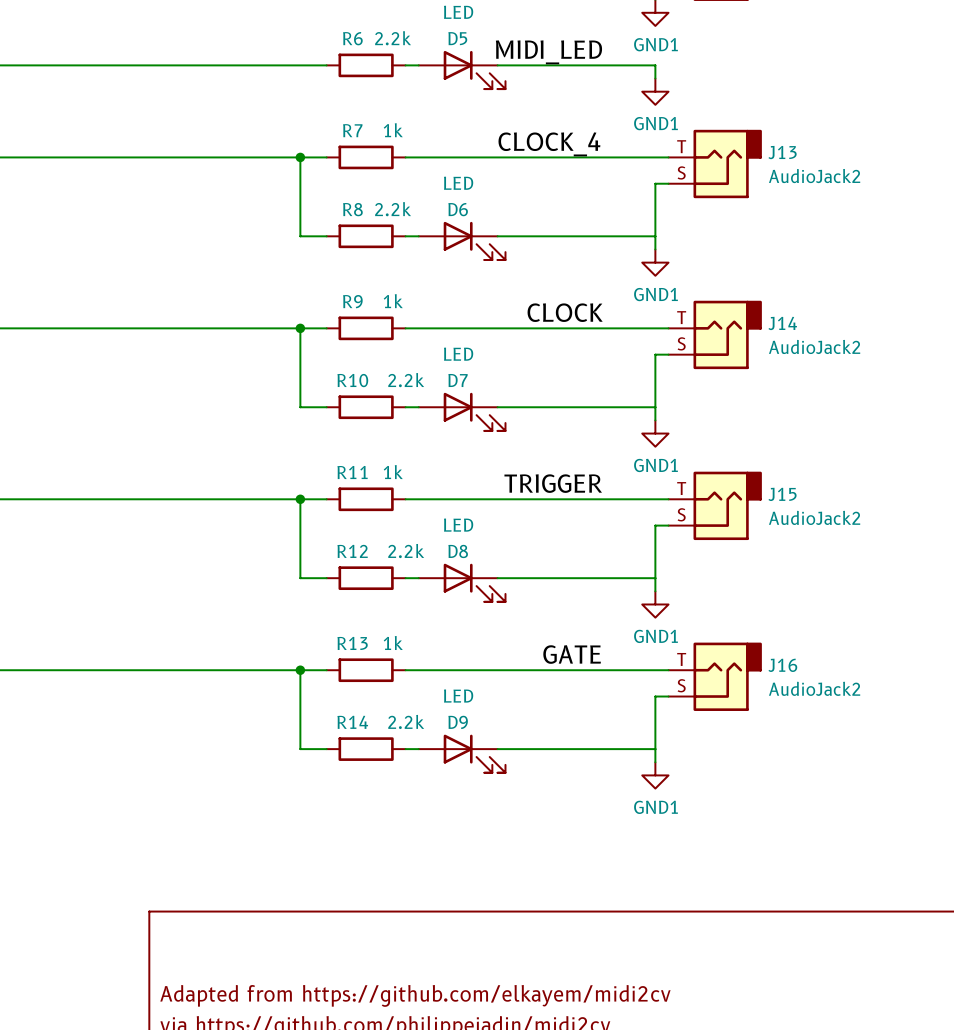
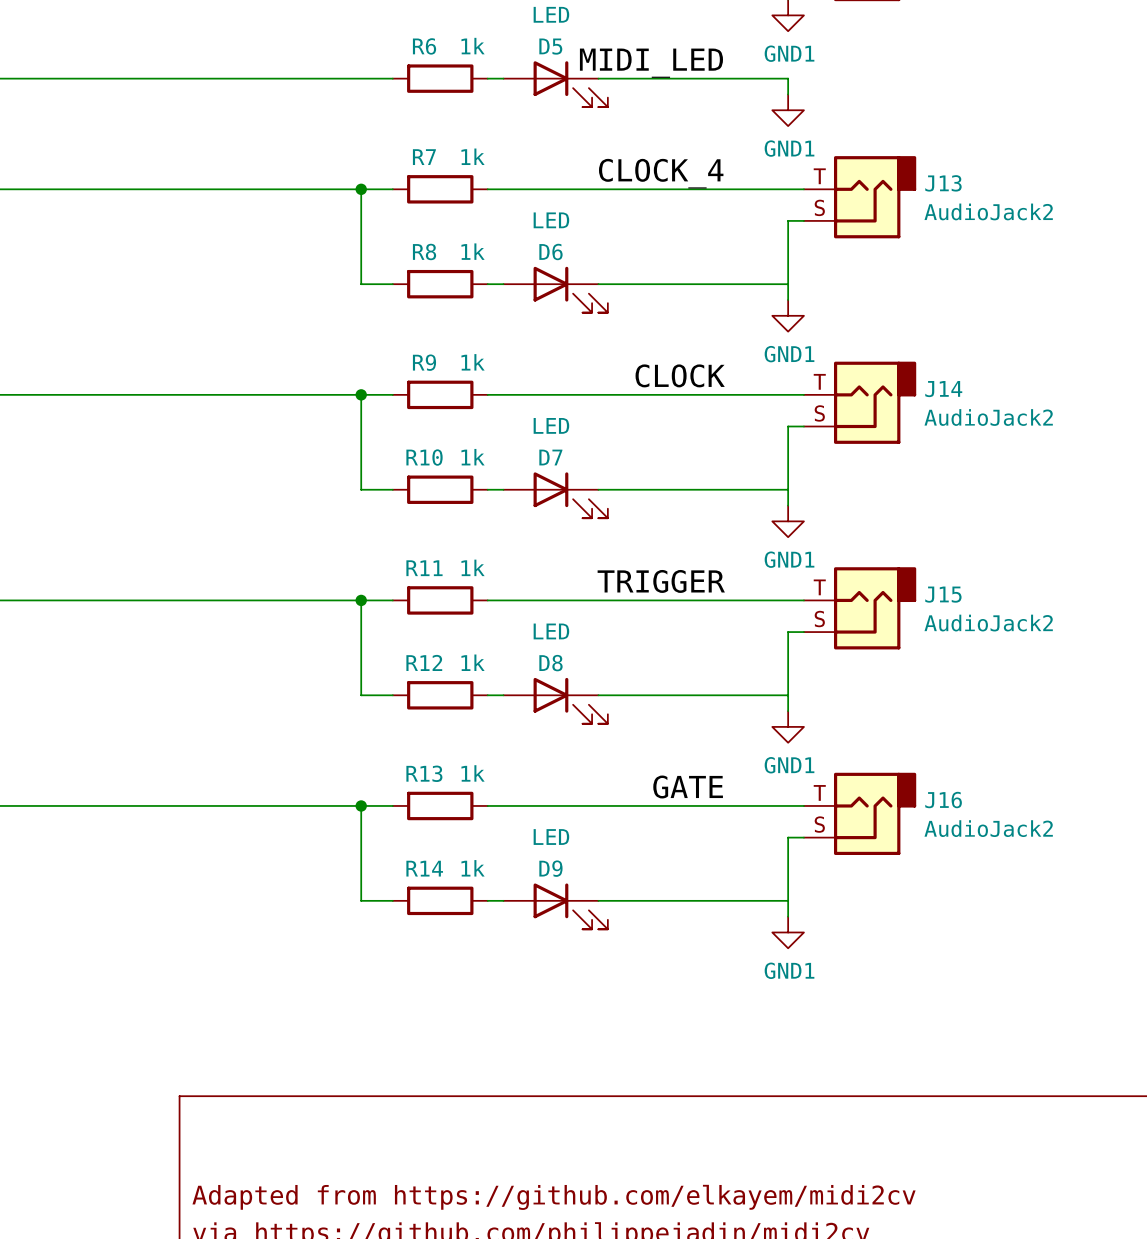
R6 value: 2.2k (393, 38) -> 1k (473, 46)
R8 value: 2.2k (393, 209) -> 1k (473, 251)
R10 value: 2.2k (406, 380) -> 1k (473, 457)
R12 value: 2.2k (406, 551) -> 1k (473, 662)
R14 value: 2.2k (406, 721) -> 1k (473, 868)

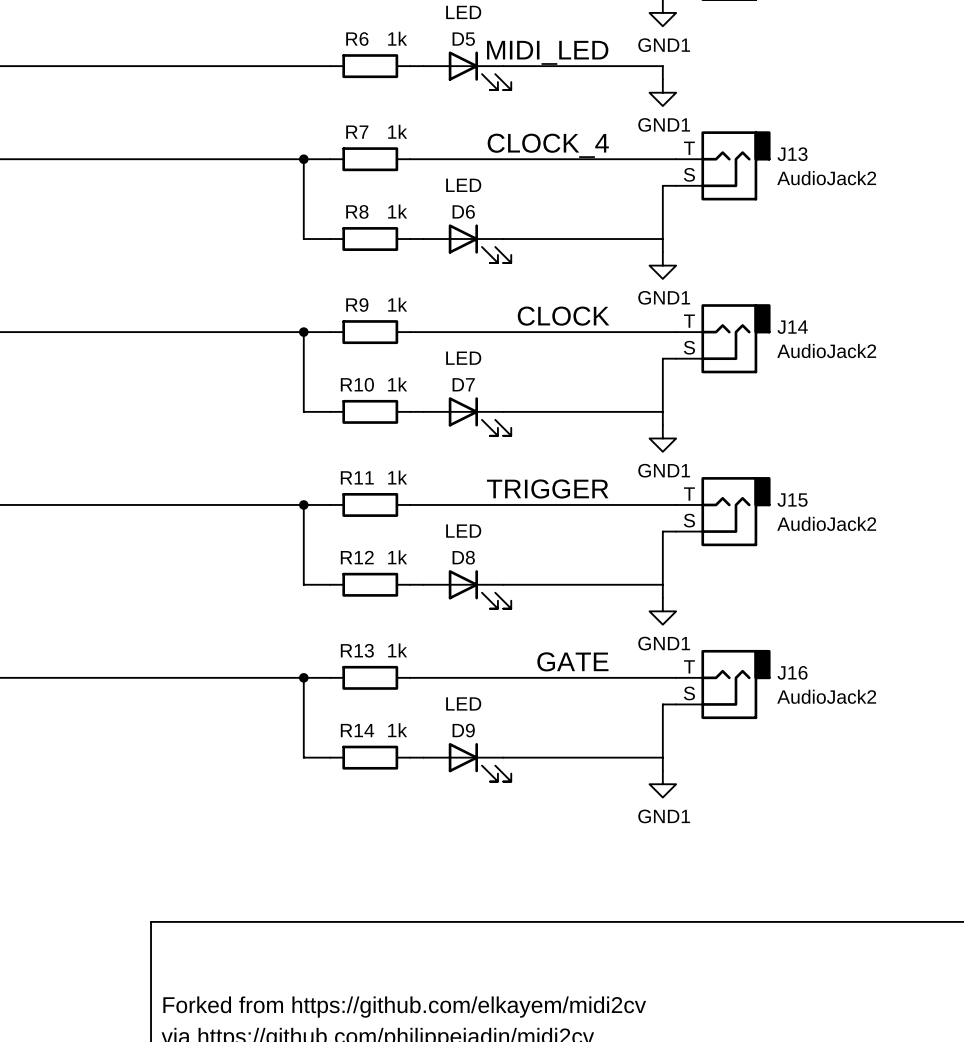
title block: Adapted from https://github.com/elkayem/midi2cv (554, 1197) -> Forked from https://github.com/elkayem/midi2cv (404, 1007)

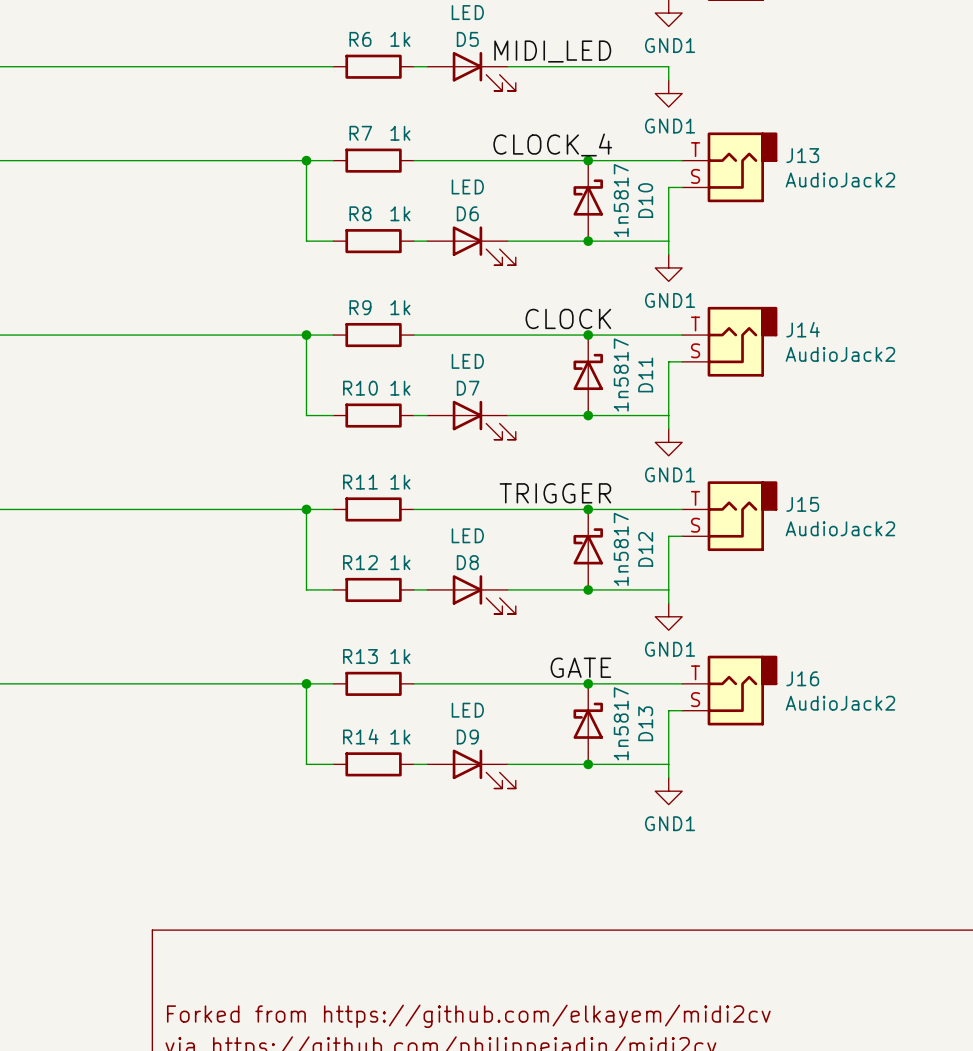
junction: none -> (588, 160)
D10: none -> 1n5817 (588, 200)
junction: none -> (588, 241)
junction: none -> (588, 335)
D11: none -> 1n5817 (588, 375)
junction: none -> (588, 415)
junction: none -> (588, 509)
D12: none -> 1n5817 (588, 549)
junction: none -> (588, 589)
junction: none -> (588, 683)
D13: none -> 1n5817 (588, 724)
junction: none -> (588, 764)

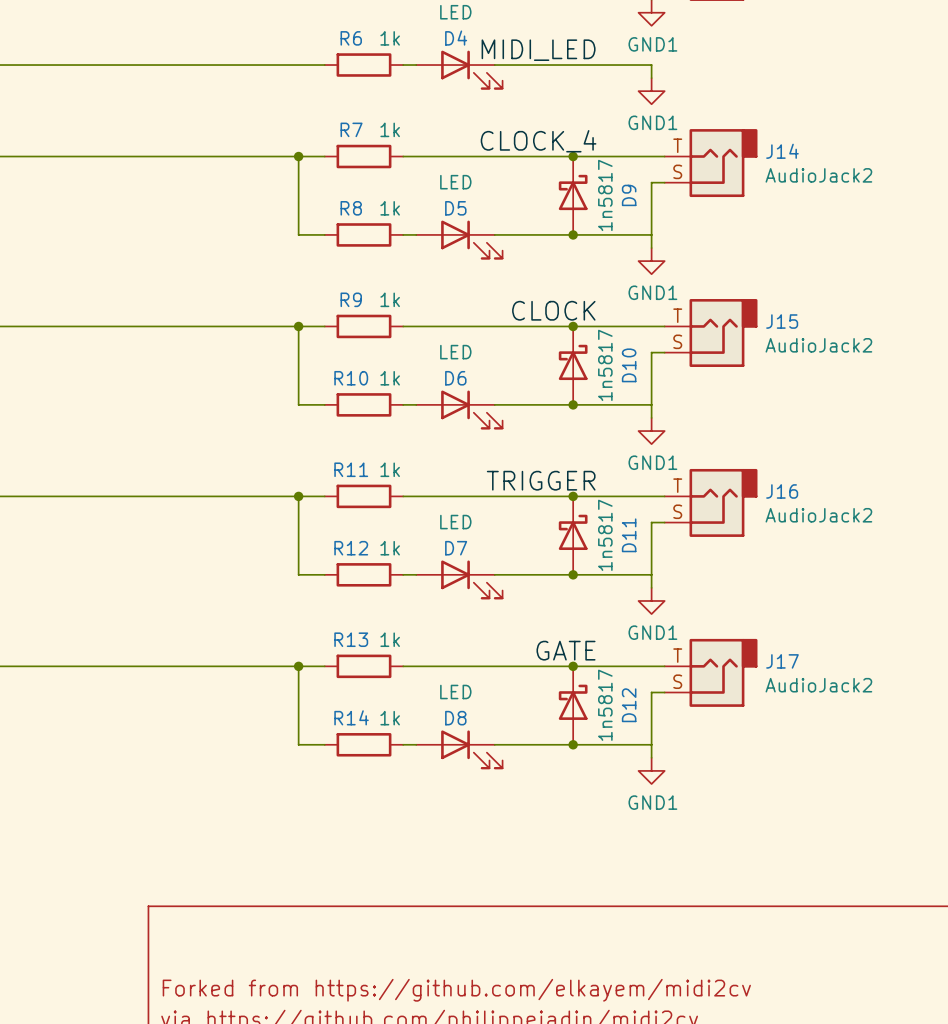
D5 name: D5 (467, 39) -> D4 (456, 38)
J13 name: J13 (802, 155) -> J14 (782, 151)
D10 name: D10 (645, 200) -> D9 (629, 195)
D6 name: D6 (467, 213) -> D5 (455, 208)
J14 name: J14 (803, 329) -> J15 (782, 321)
D11 name: D11 (645, 374) -> D10 (629, 365)
D7 name: D7 (468, 388) -> D6 (455, 378)
J15 name: J15 (802, 504) -> J16 (782, 491)
D12 name: D12 (645, 549) -> D11 (629, 535)
D8 name: D8 (467, 562) -> D7 (456, 548)
J16 name: J16 (802, 678) -> J17 (782, 661)
D13 name: D13 (645, 723) -> D12 (629, 705)
D9 name: D9 (467, 737) -> D8 (455, 718)

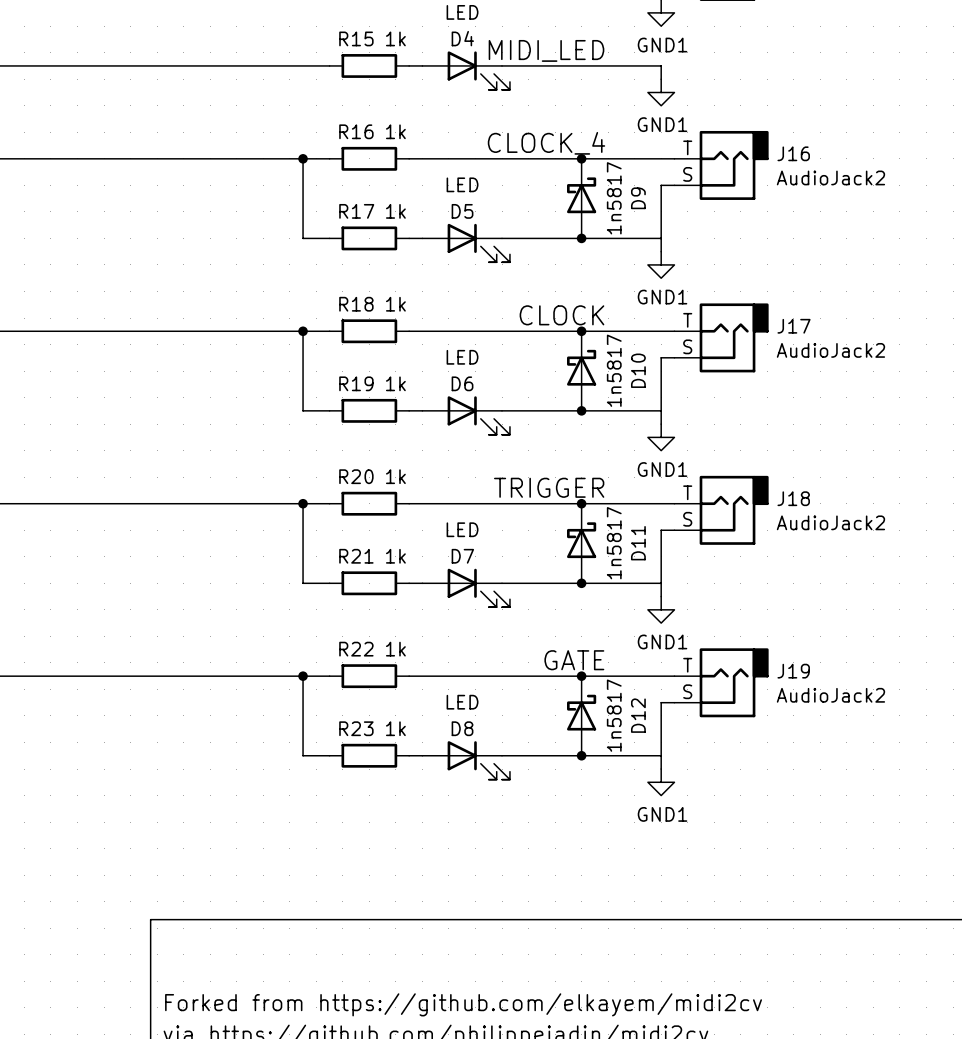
R6 name: R6 (351, 38) -> R15 (356, 38)
R7 name: R7 (351, 129) -> R16 (356, 131)
J14 name: J14 (782, 151) -> J16 (793, 153)
R8 name: R8 (351, 208) -> R17 (356, 211)
R9 name: R9 (351, 299) -> R18 (356, 304)
J15 name: J15 (782, 321) -> J17 (794, 326)
R10 name: R10 (351, 378) -> R19 (356, 383)
R11 name: R11 (351, 469) -> R20 (356, 476)
J16 name: J16 (782, 491) -> J18 (793, 498)
R12 name: R12 (351, 548) -> R21 (356, 556)
R13 name: R13 (351, 639) -> R22 (356, 649)
J17 name: J17 (782, 661) -> J19 (793, 671)
R14 name: R14 (351, 717) -> R23 (356, 728)

